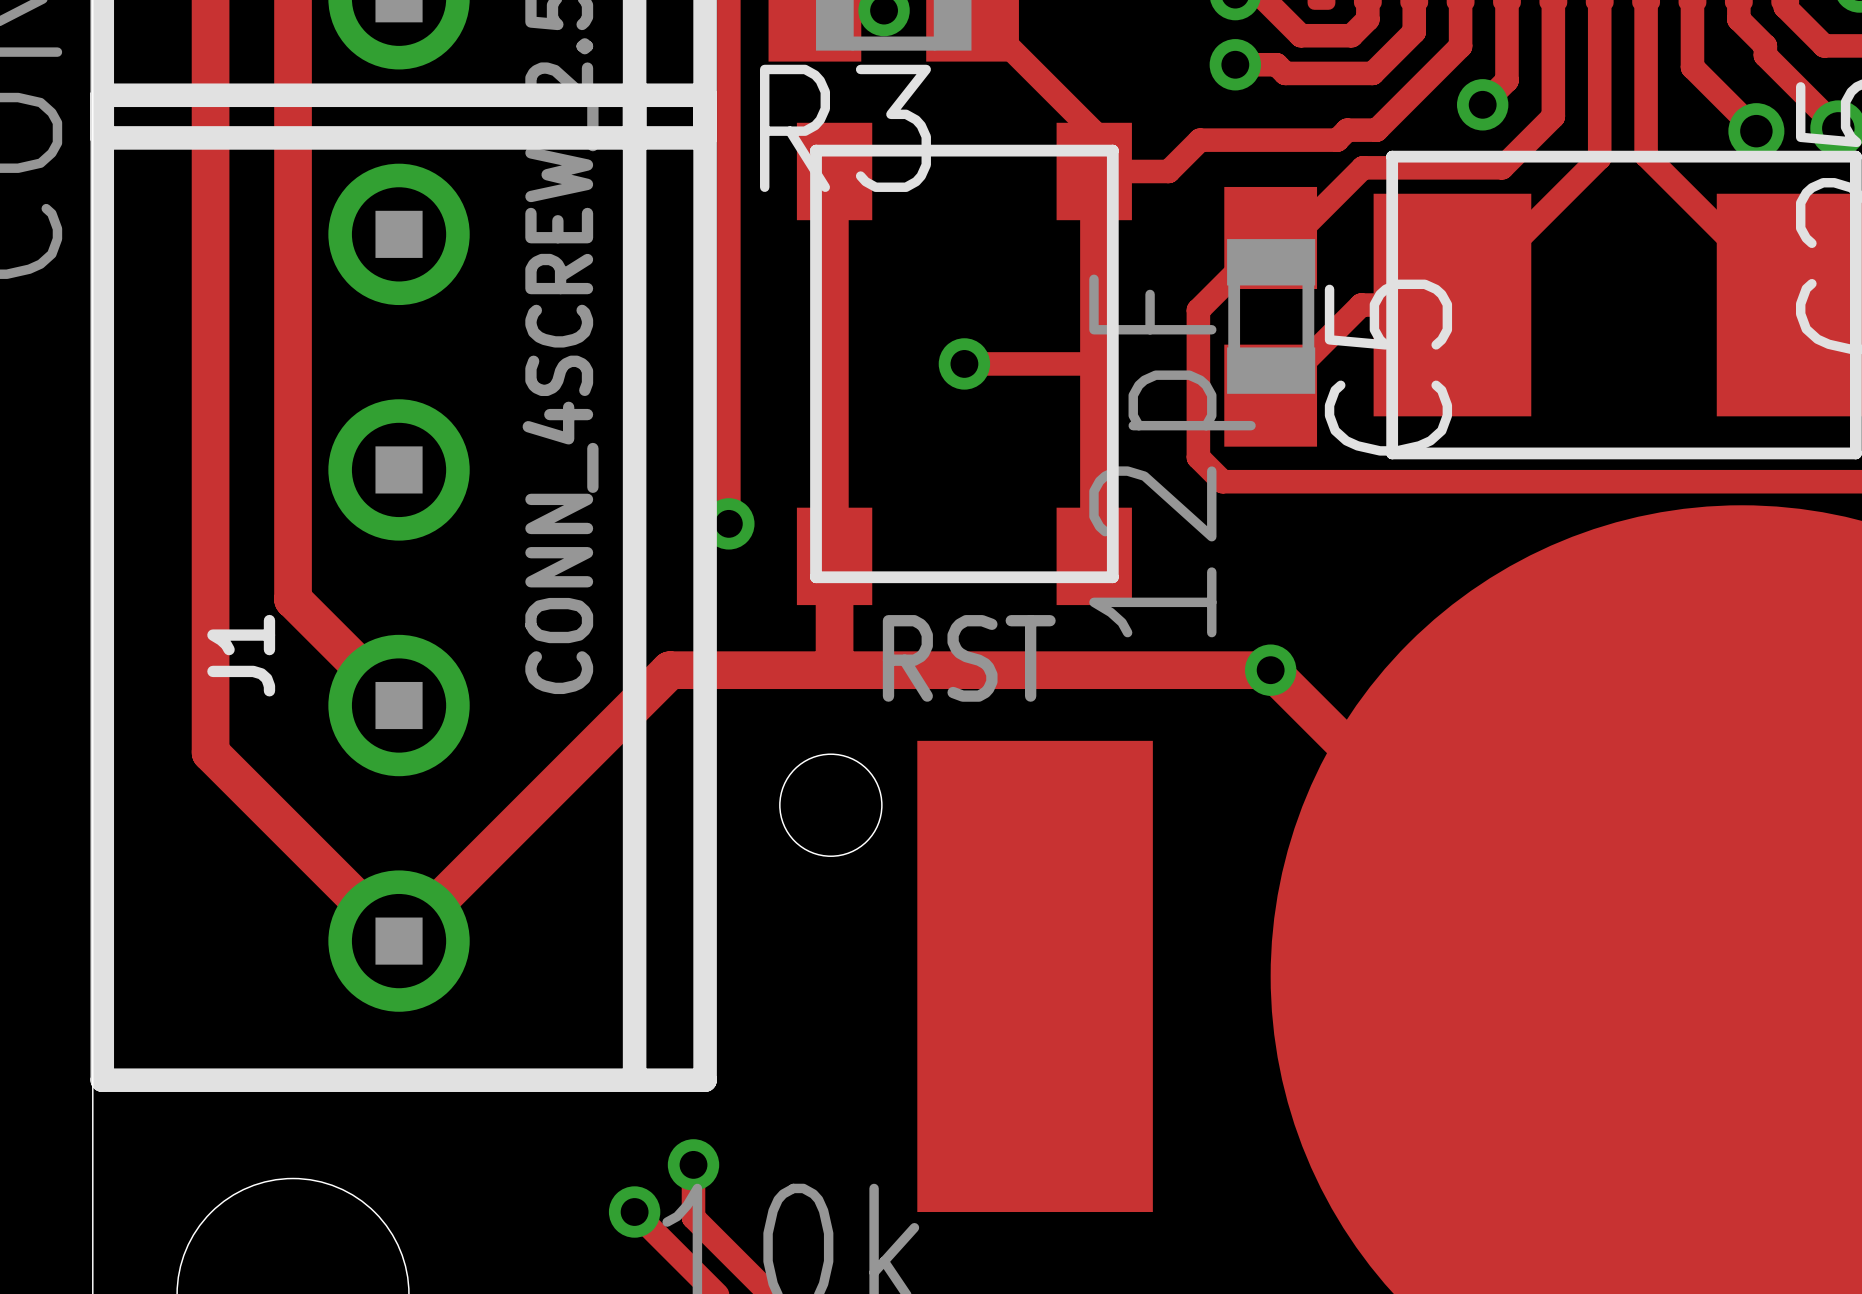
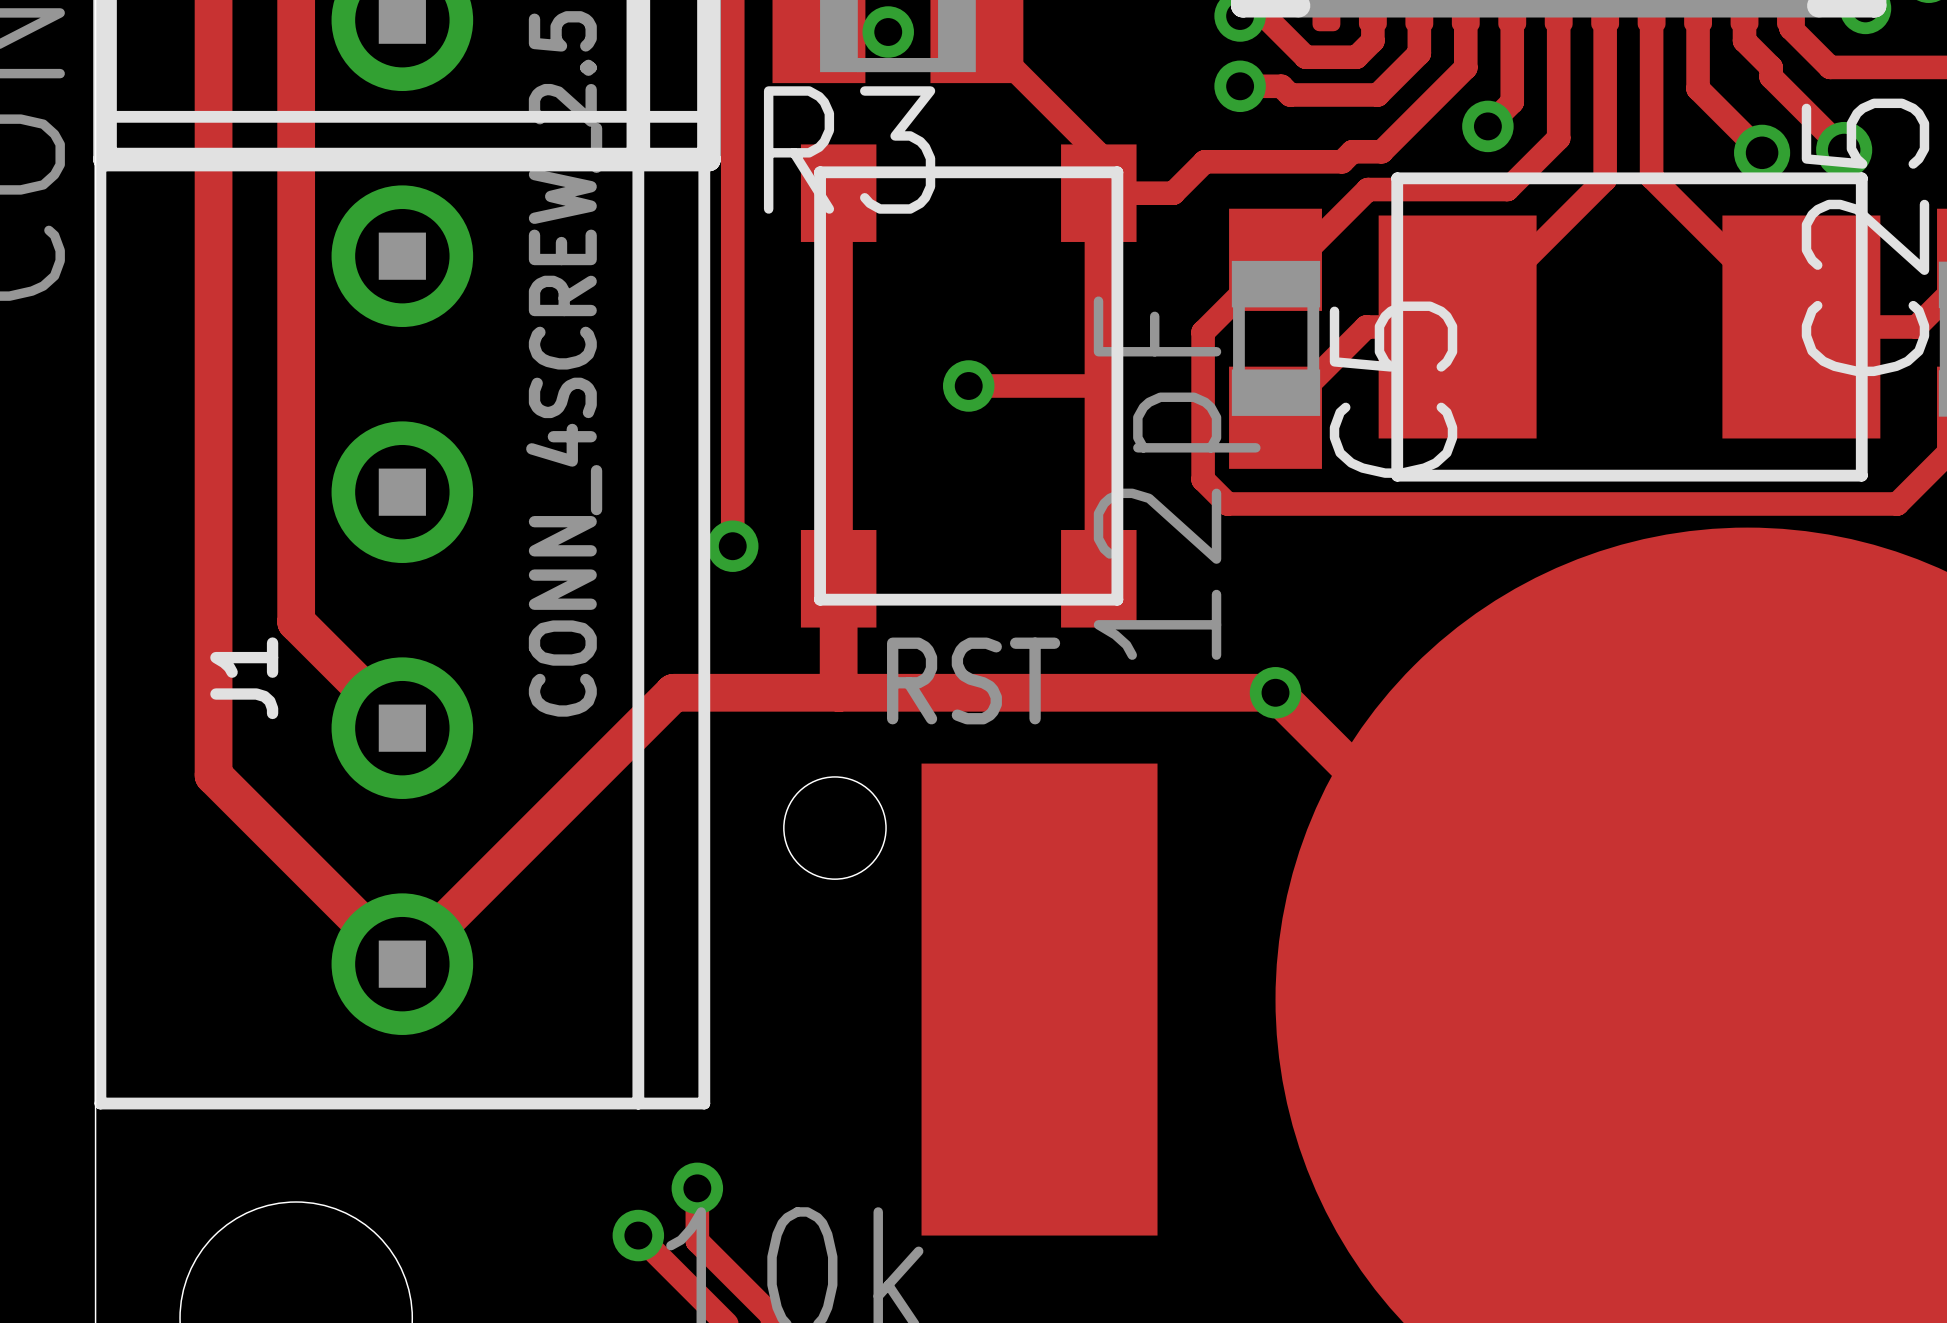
J1 footprint: [90, 83, 717, 1092] -> [94, 110, 711, 1110]

